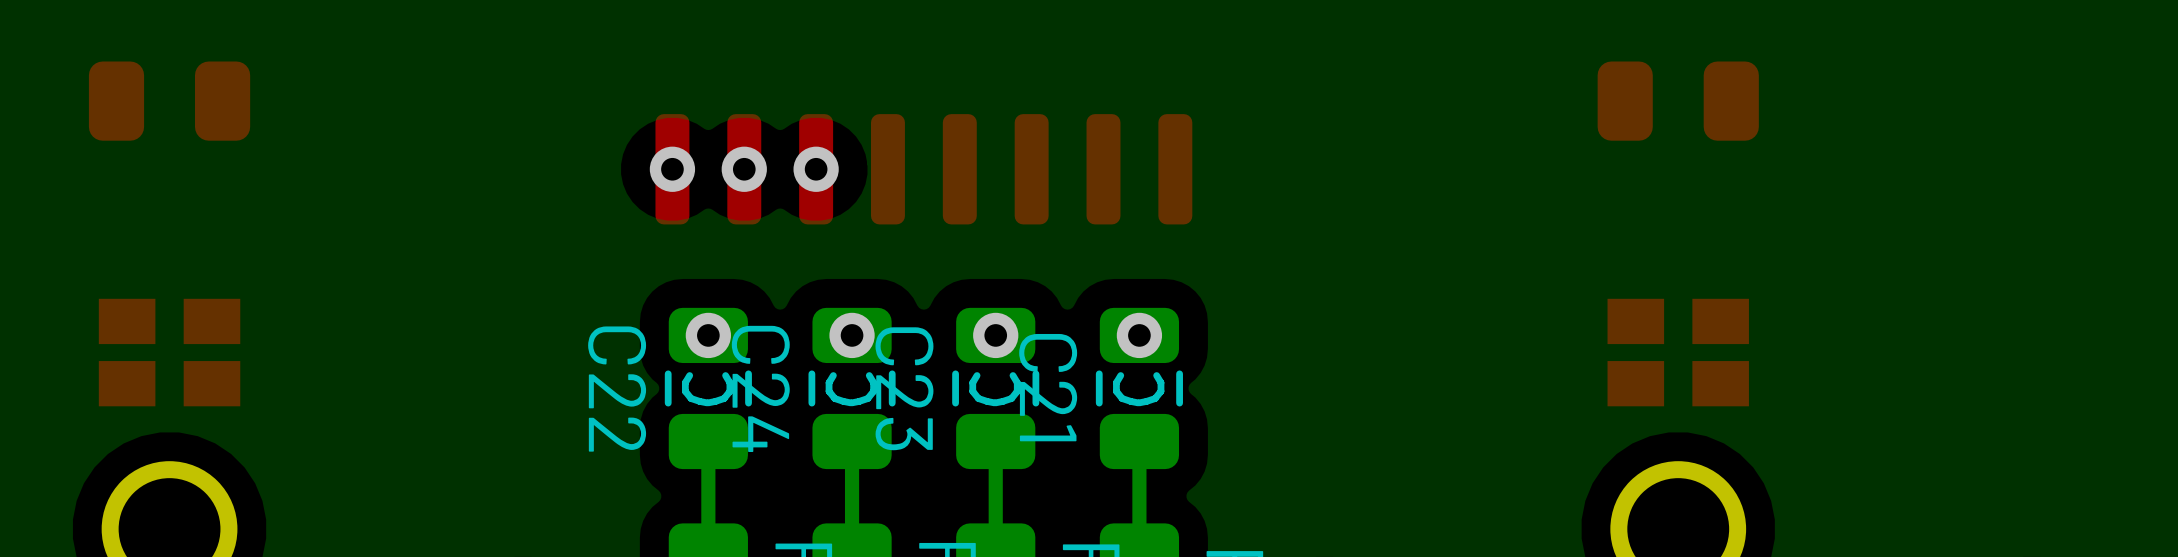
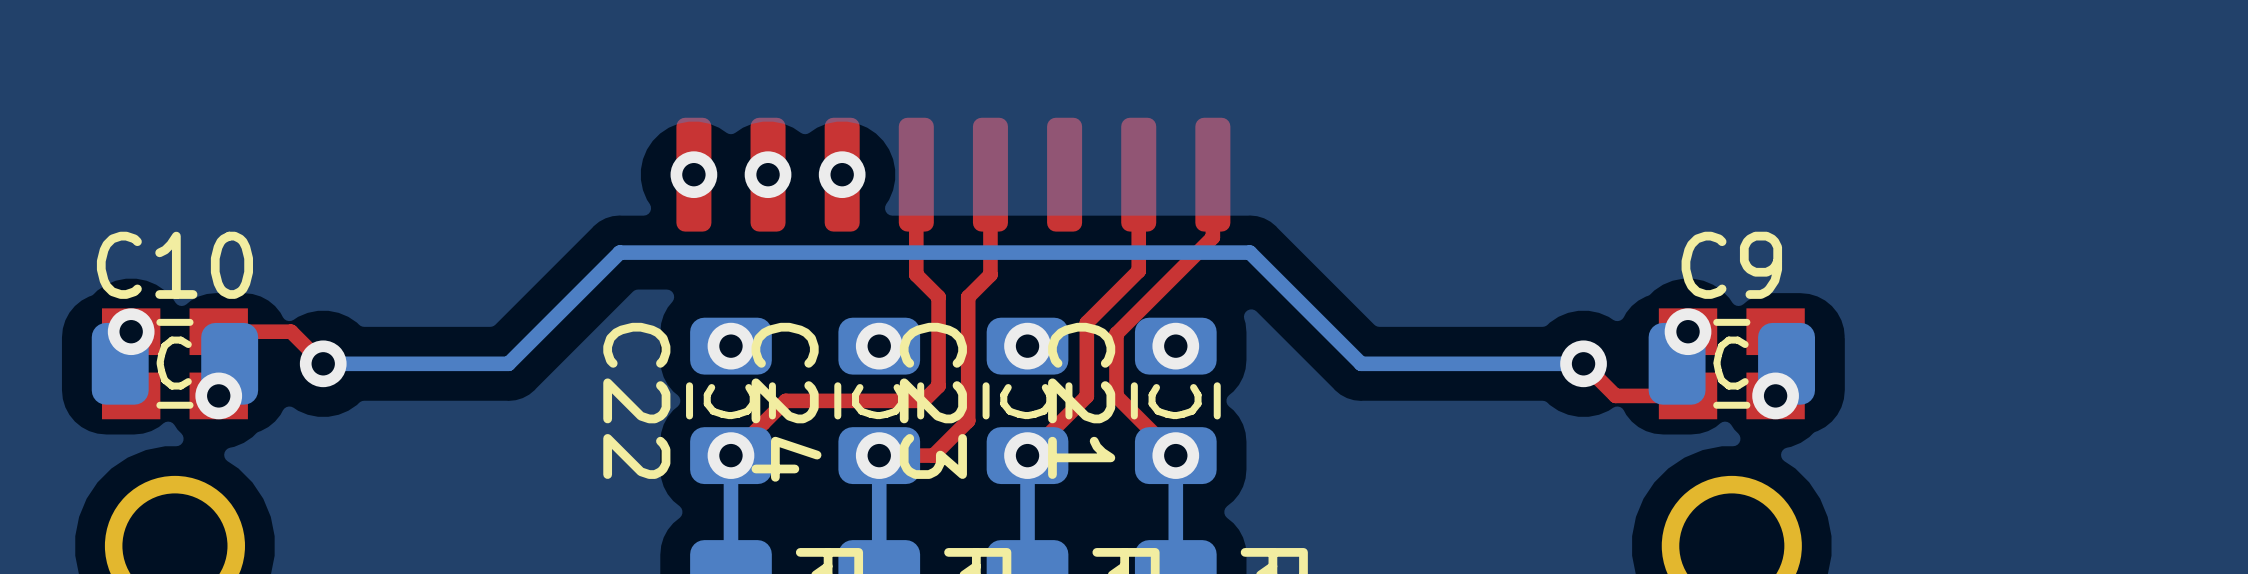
C10 side: top (169, 101) -> bottom (174, 363)
C9 side: top (1678, 101) -> bottom (1731, 363)
top track: none -> (916, 174) (916, 274) (938, 297) (938, 386) (923, 400) (785, 400) (730, 455)
top track: none -> (990, 174) (990, 274) (968, 297) (968, 420) (933, 455) (879, 455)
top track: none -> (1138, 174) (1138, 270) (1086, 322) (1086, 396) (1027, 455)
top track: none -> (1212, 174) (1212, 237) (1116, 333) (1116, 396) (1175, 455)
via: none -> (131, 331)
top track: none -> (218, 331) (291, 331) (323, 363)
via: none -> (1688, 331)
via: none -> (323, 363)
bottom track: none -> (1583, 363) (1361, 363) (1249, 252) (619, 252) (508, 363) (323, 363)
top track: none -> (1583, 363) (1615, 395) (1688, 395)
via: none -> (1583, 363)
via: none -> (218, 395)
via: none -> (1775, 395)
via: none -> (730, 455)
via: none -> (879, 455)
via: none -> (1027, 455)
via: none -> (1175, 455)

